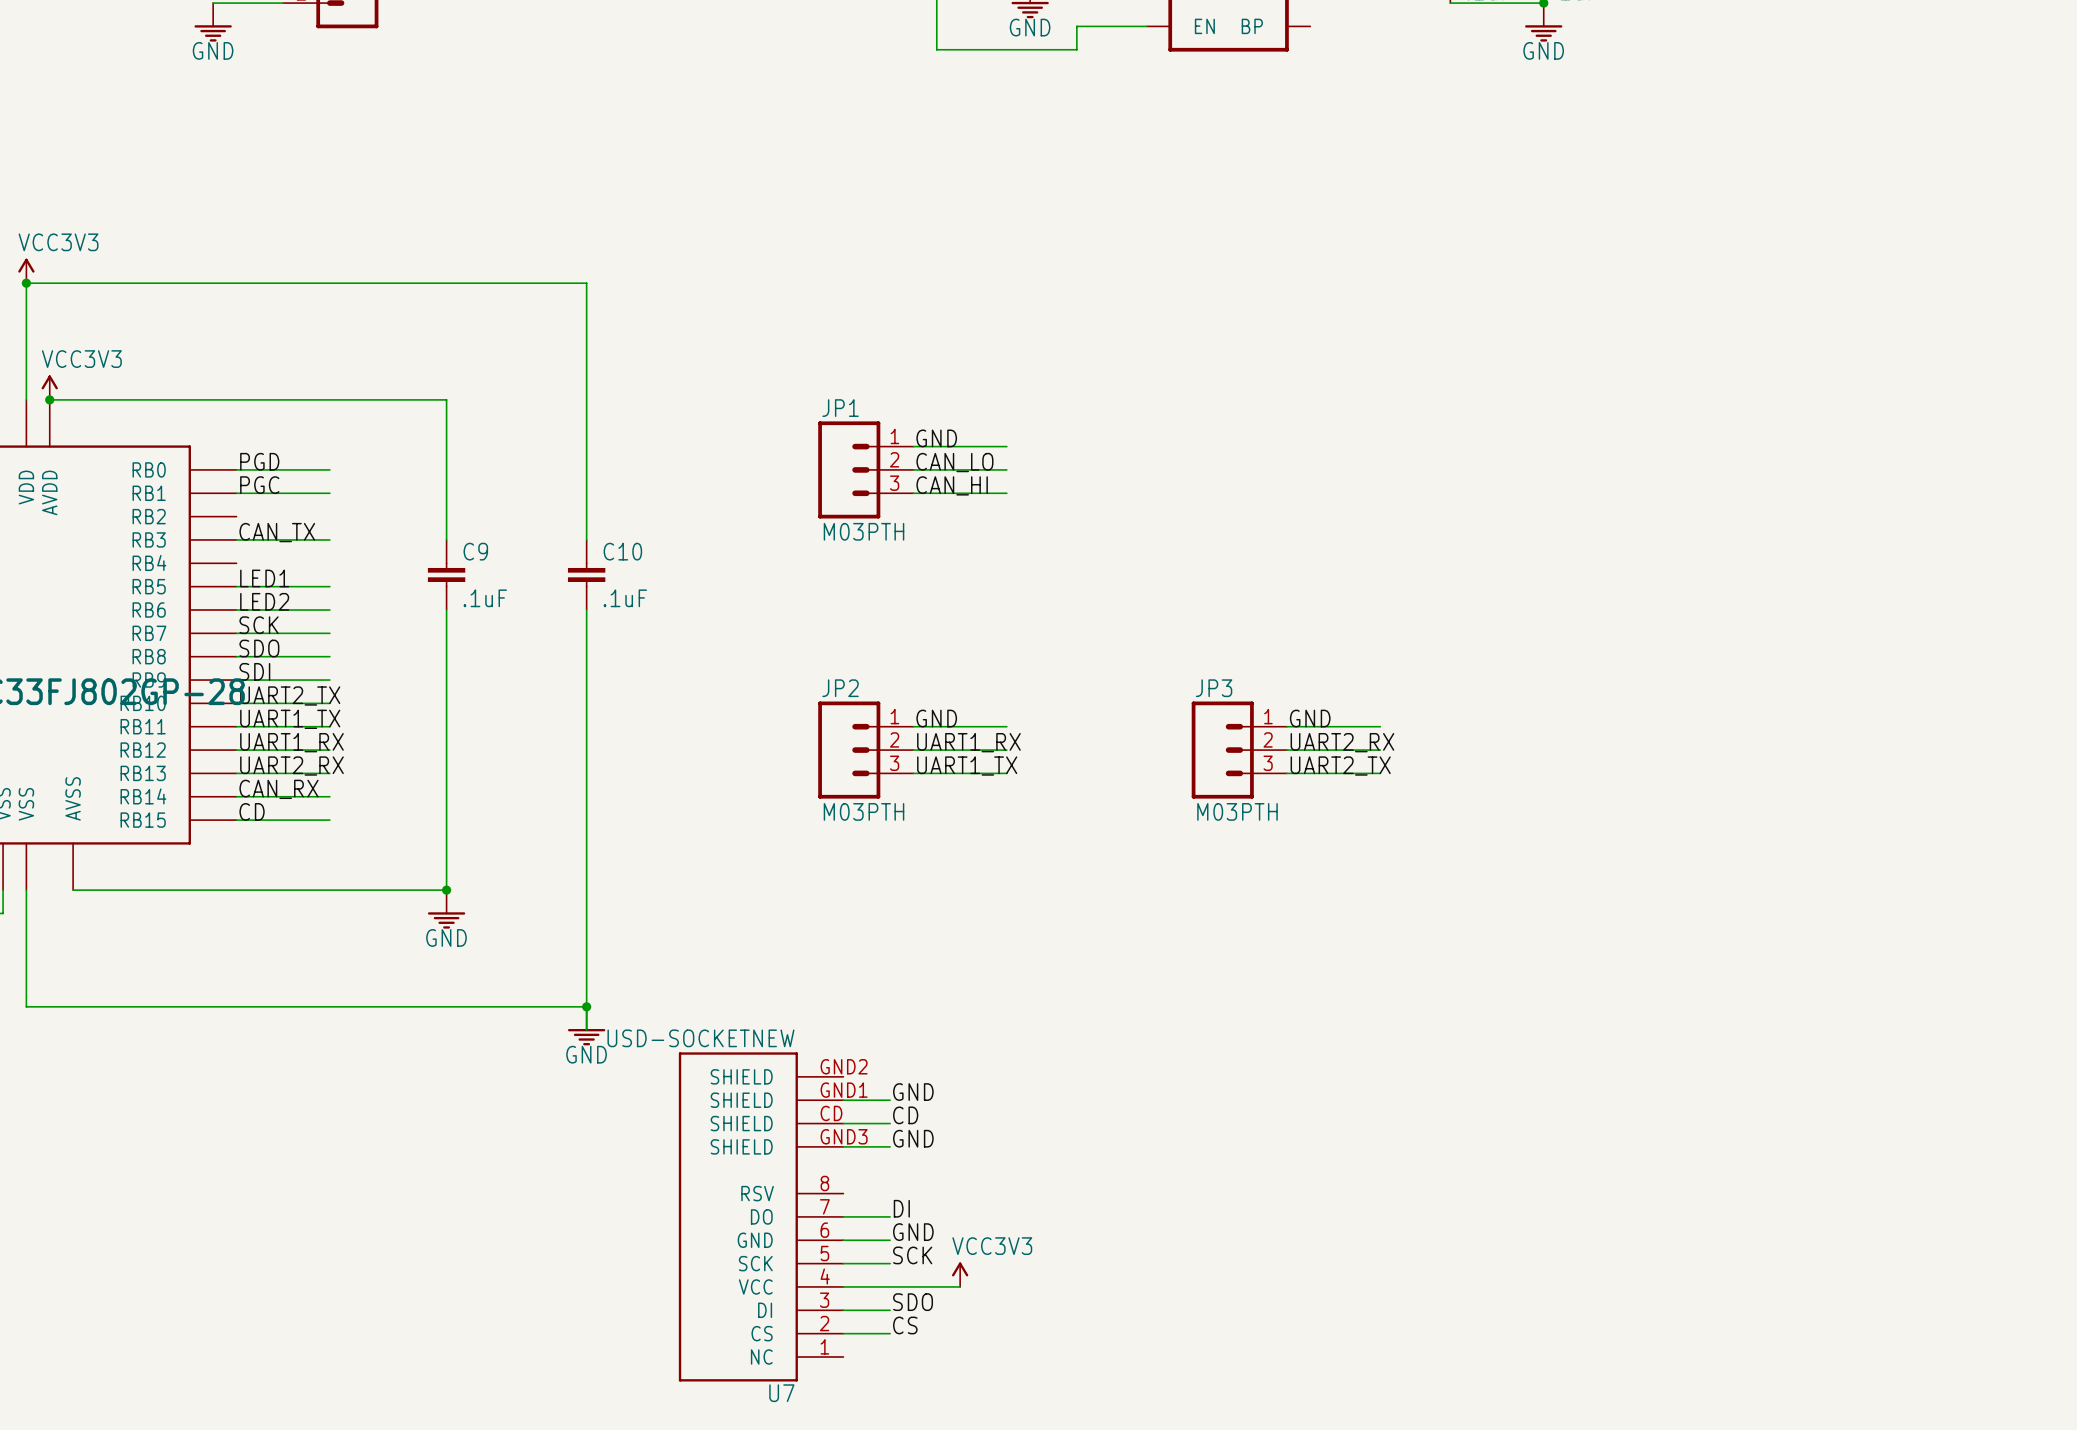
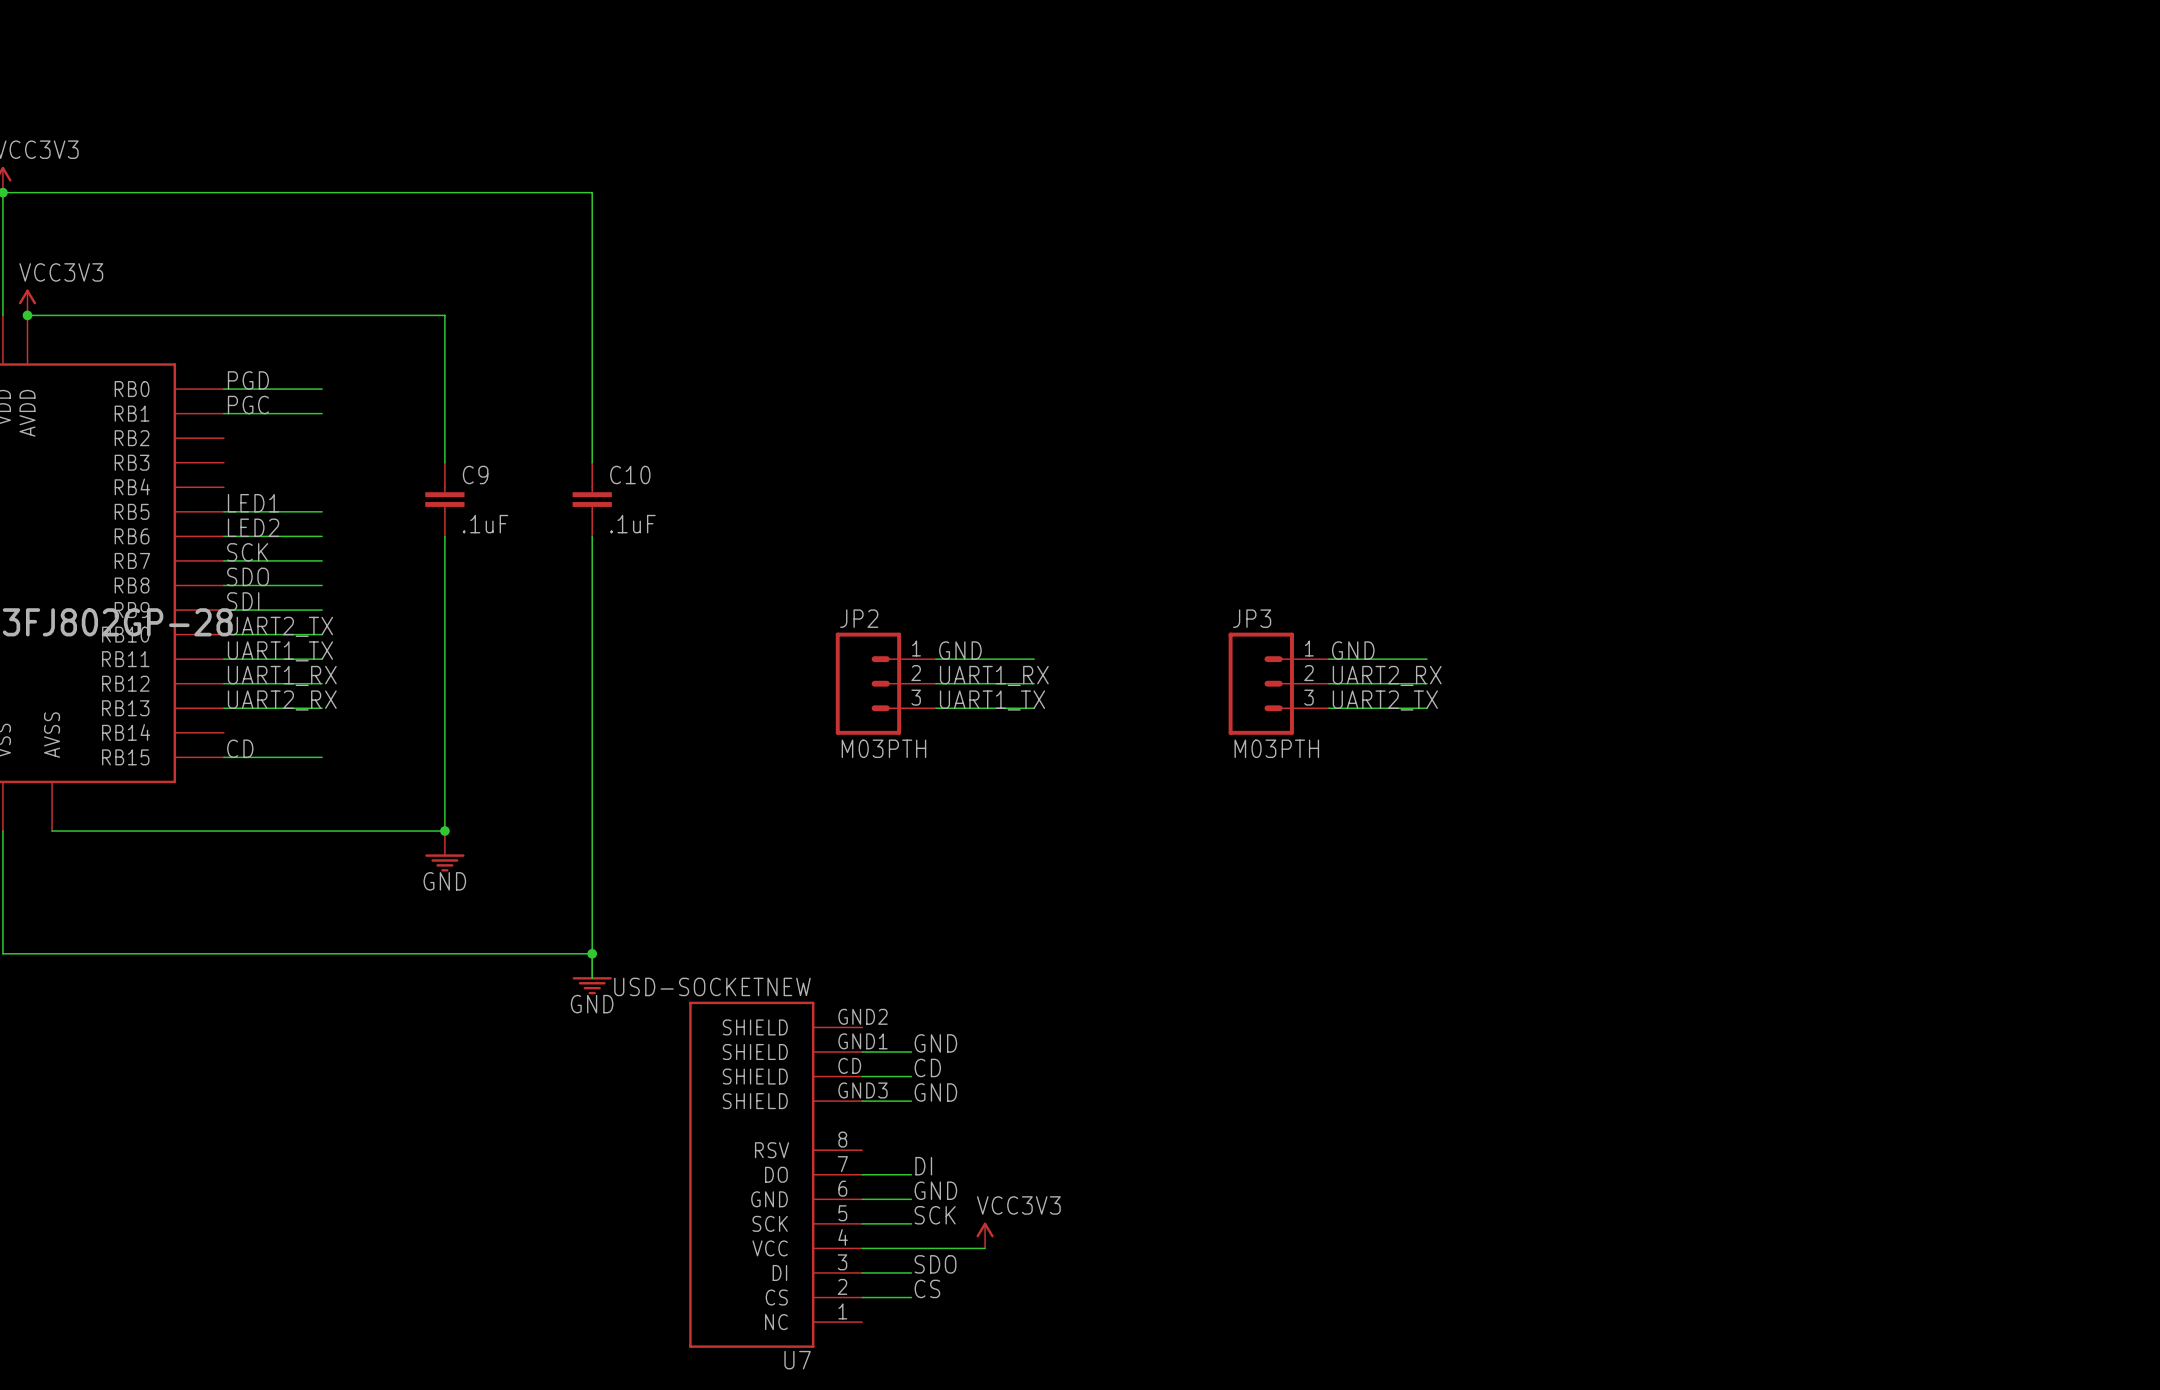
label: GND (936, 438) -> none
wire: (913, 446) (1006, 446) -> none
label: CAN_LO (954, 462) -> none
JP1: M03PTH (865, 469) -> none
wire: (913, 469) (1006, 469) -> none
label: CAN_HI (952, 485) -> none
wire: (913, 493) (1006, 493) -> none
label: CAN_TX (277, 532) -> none
wire: (236, 539) (329, 539) -> none
label: CAN_RX (279, 789) -> none
wire: (236, 796) (329, 796) -> none

